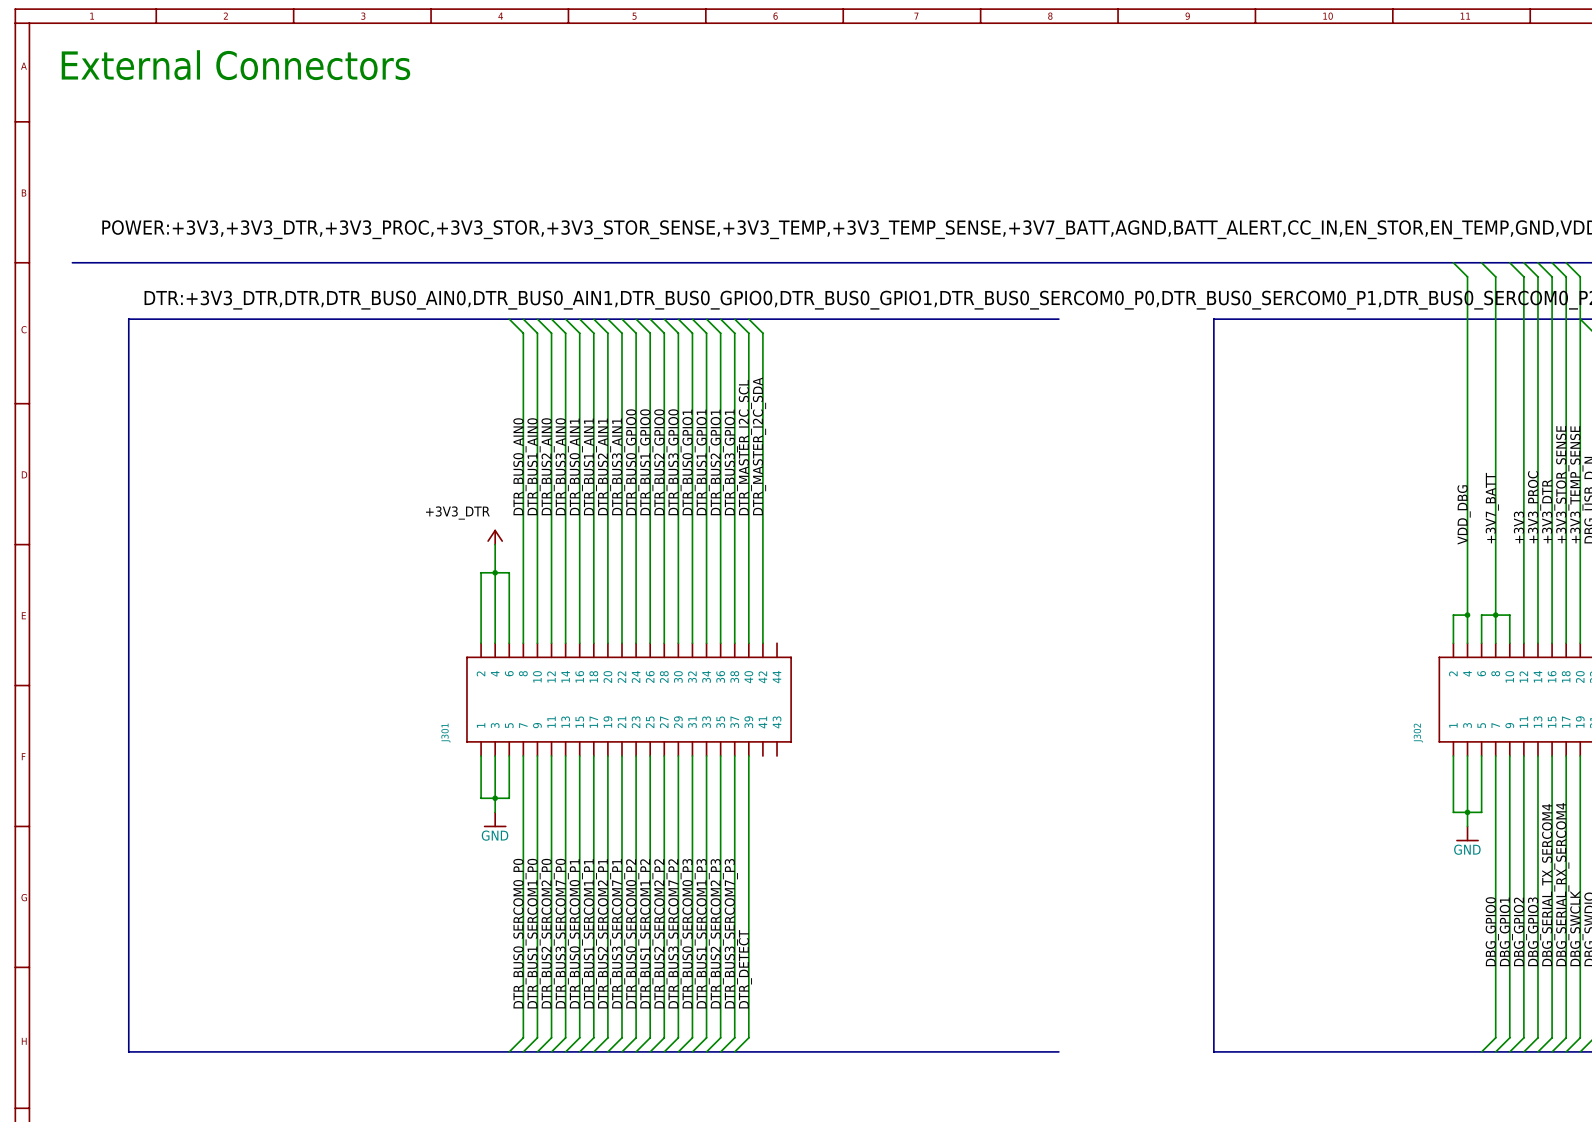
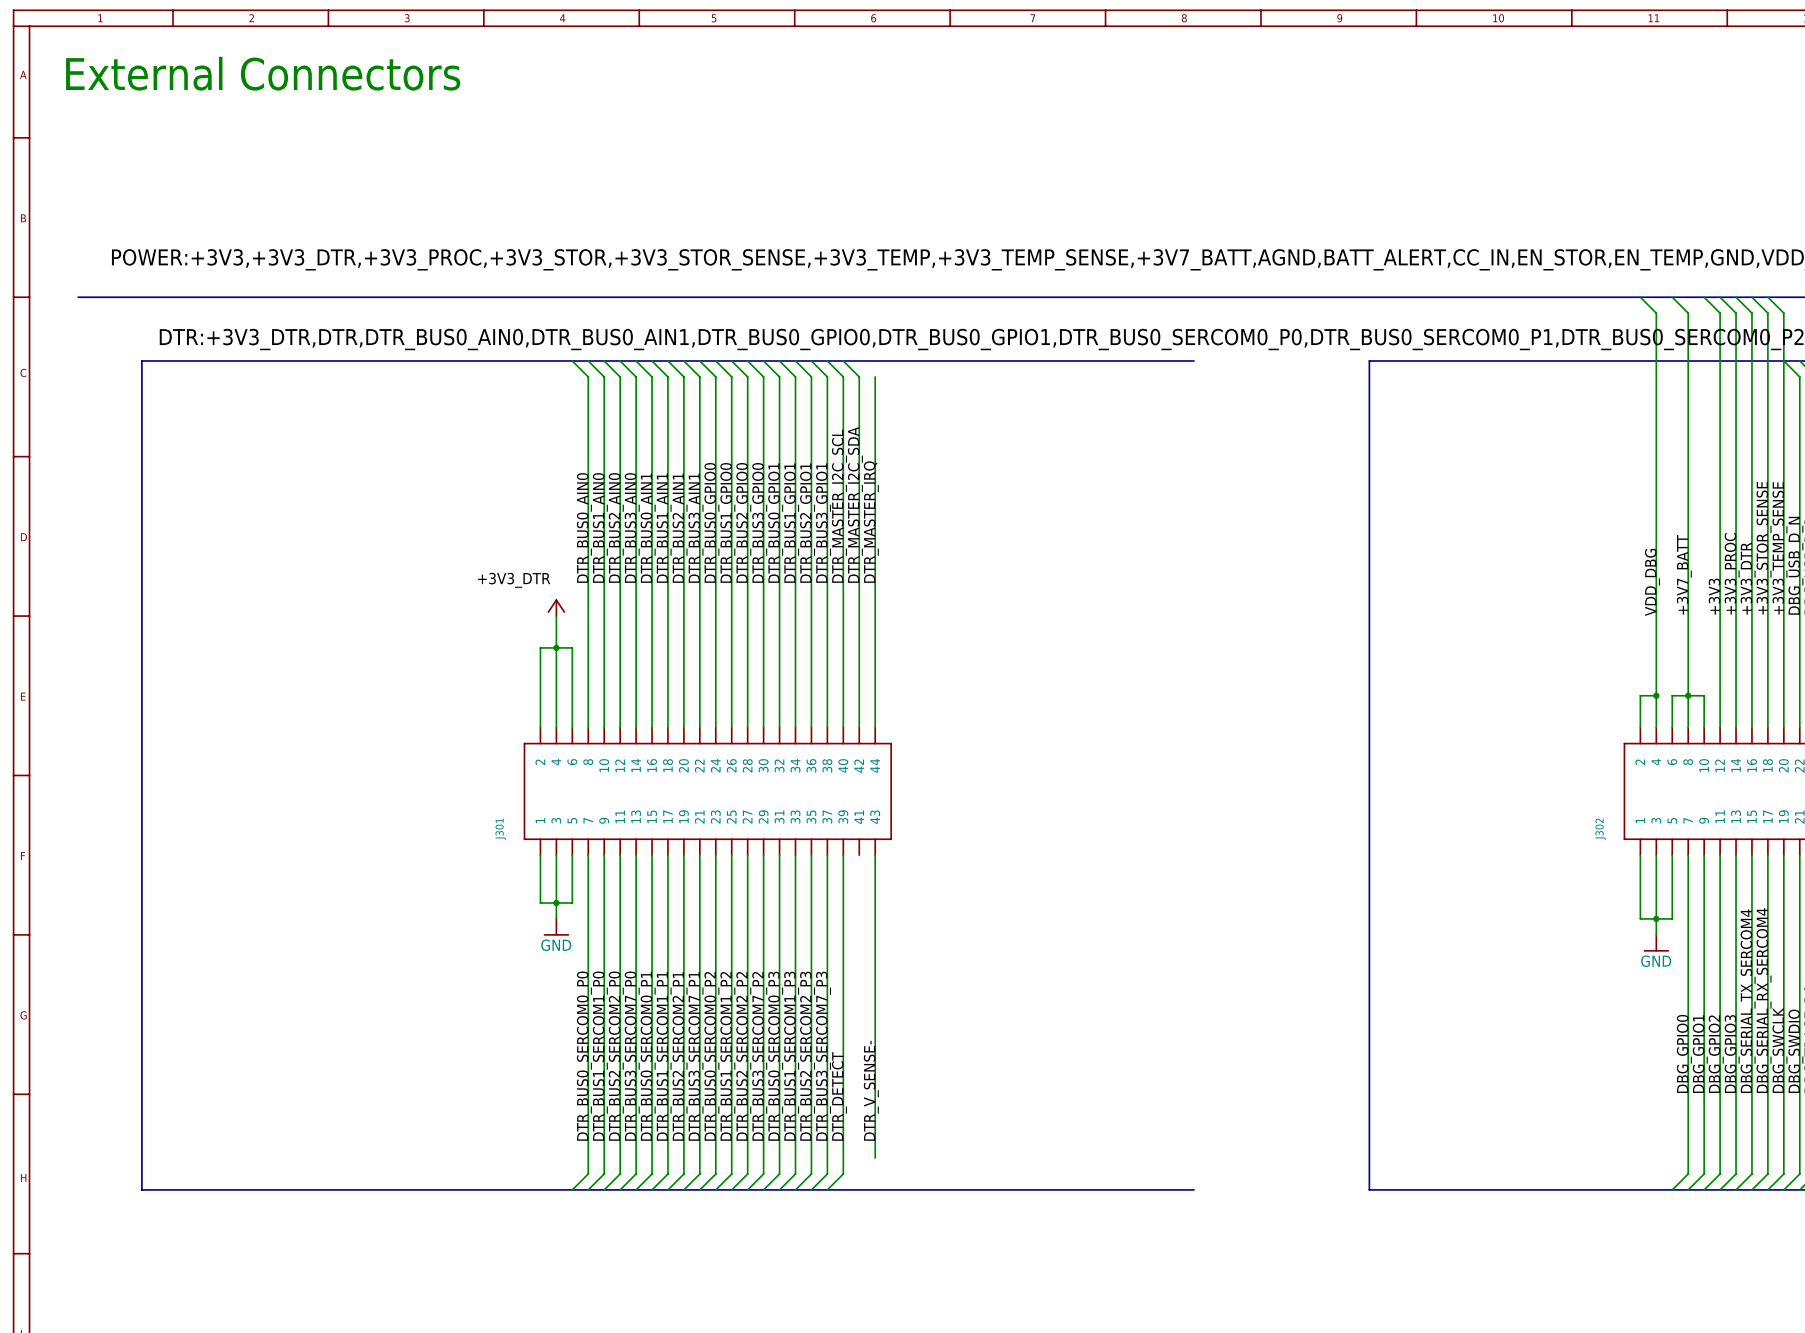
wire: none -> (875, 376) (875, 727)
label: none -> DTR_MASTER_IRQ (871, 522)
wire: none -> (875, 855) (875, 1158)
label: none -> DTR_V_SENSE- (871, 1090)

